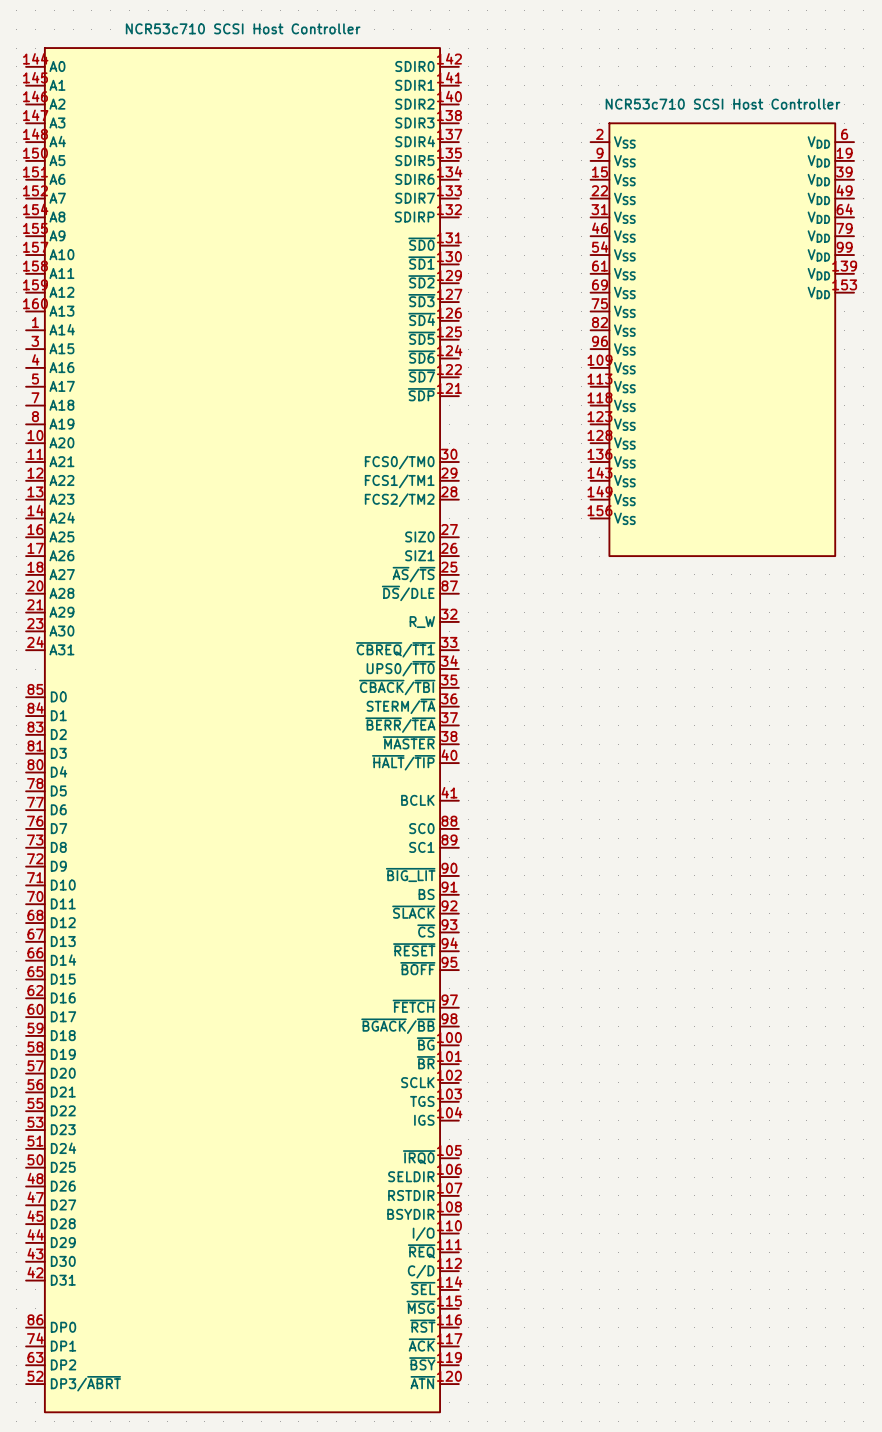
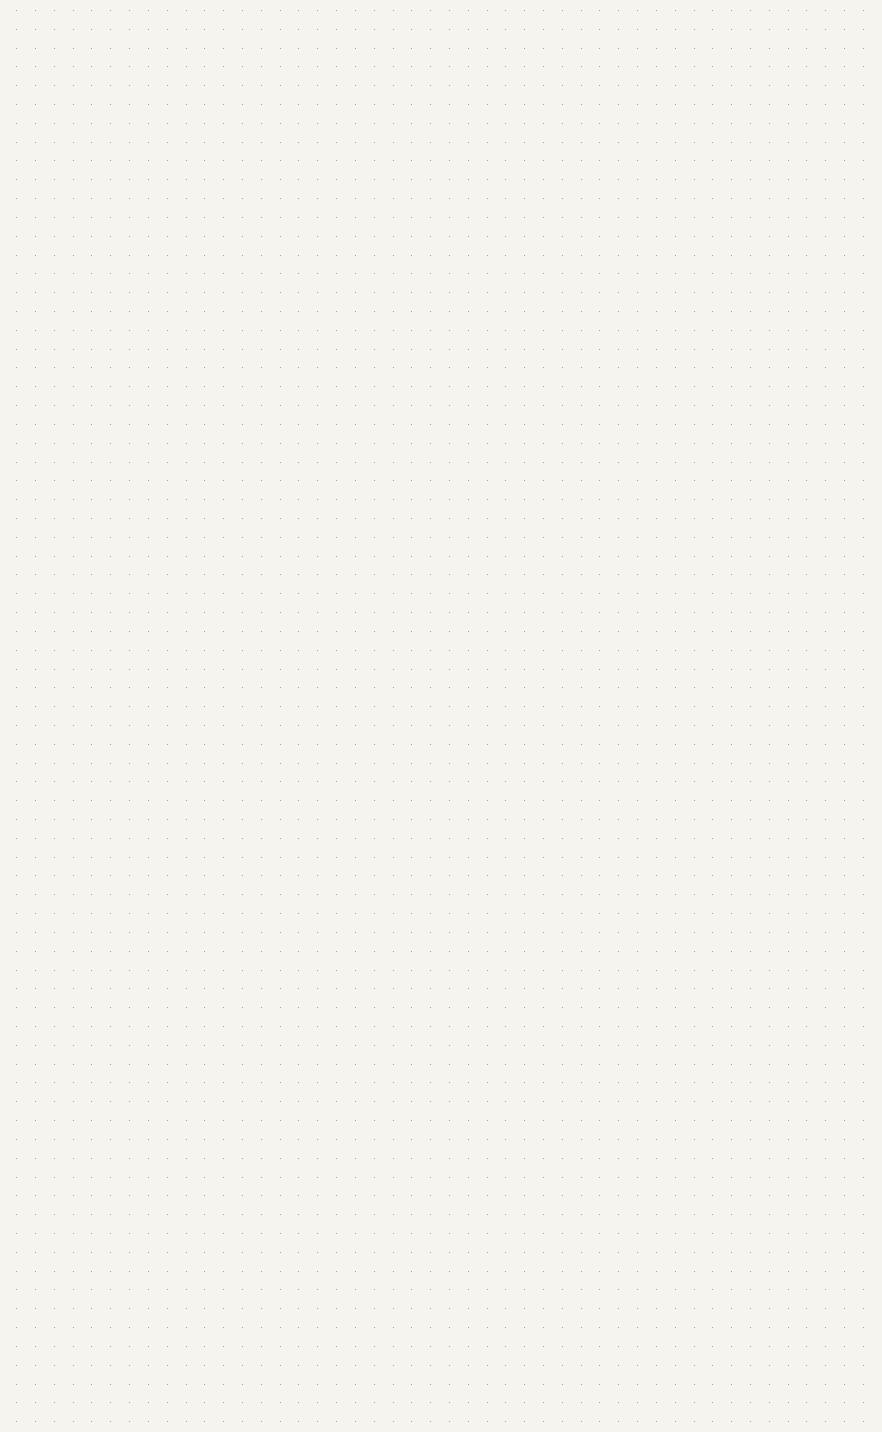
part: NCR53c710 SCSI Host Controller (722, 339) -> none
part: NCR53c710 SCSI Host Controller (242, 730) -> none

